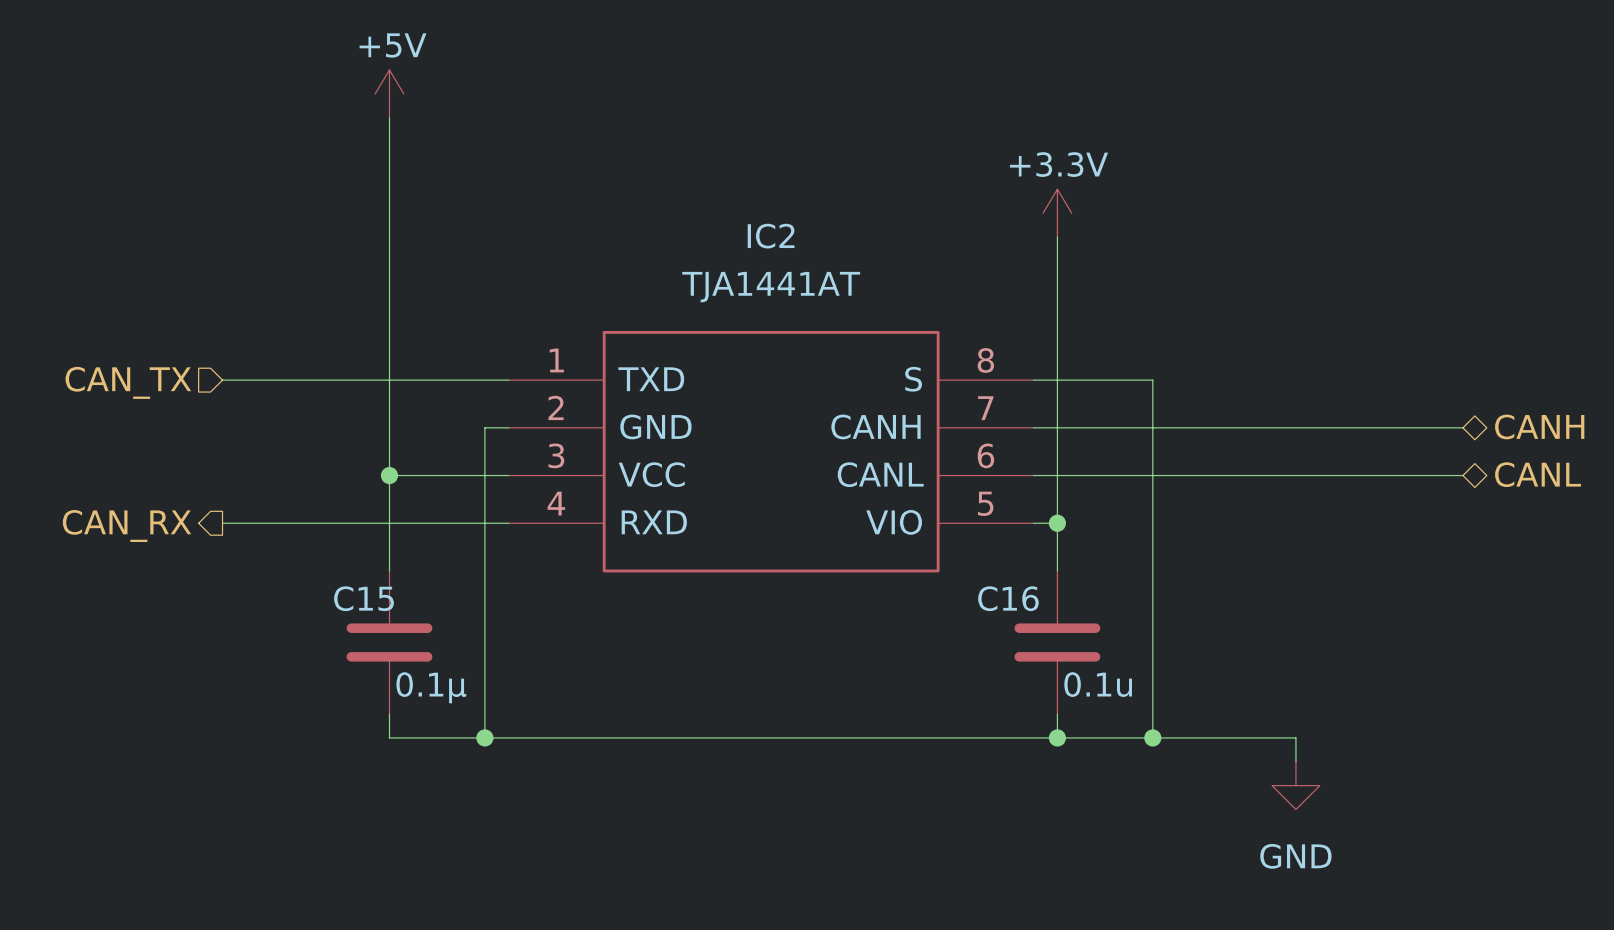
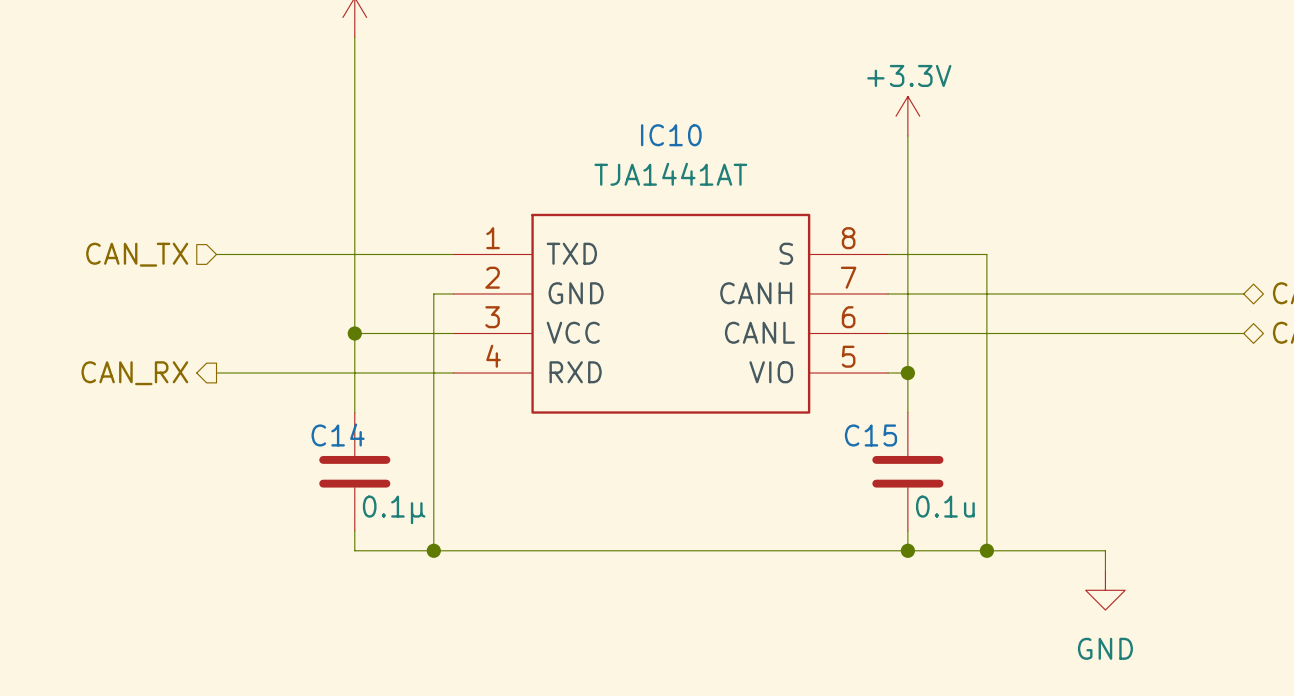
IC2 name: IC2 (771, 236) -> IC10 (671, 135)
C15 name: C15 (363, 598) -> C14 (338, 435)
C16 name: C16 (1008, 598) -> C15 (870, 435)

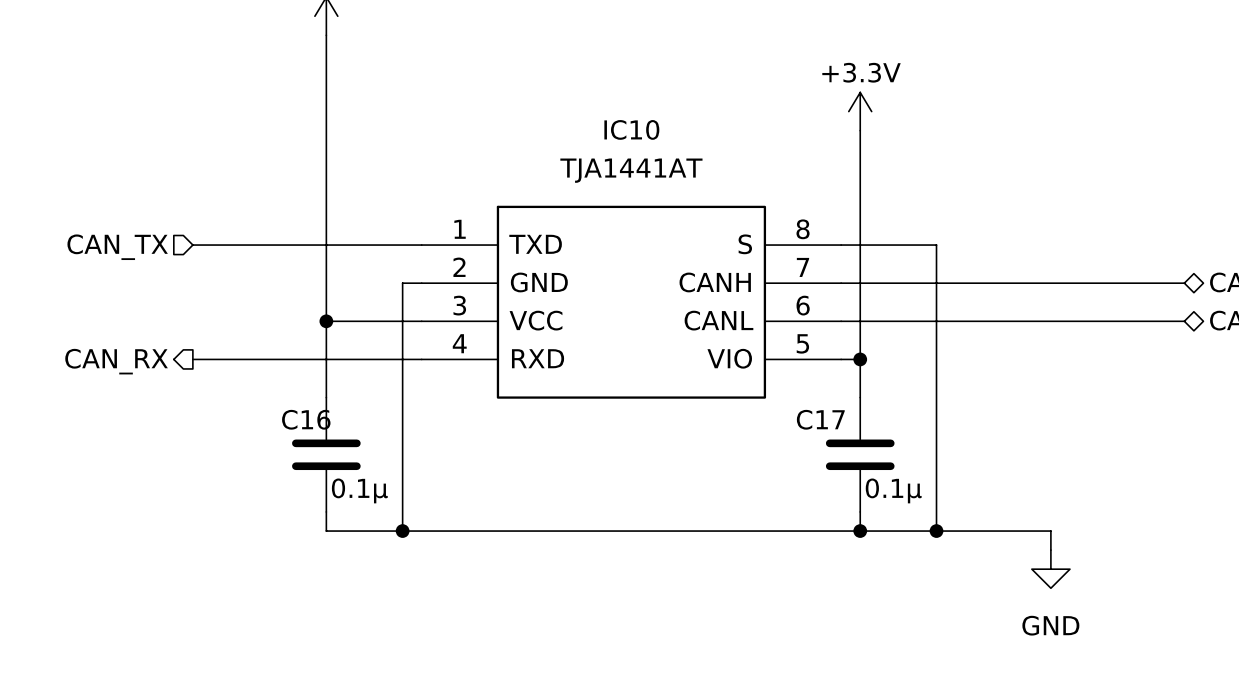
C14 name: C14 (338, 435) -> C16 (306, 419)
C15 name: C15 (870, 435) -> C17 (820, 419)
C15 value: 0.1u (945, 506) -> 0.1μ (893, 490)

